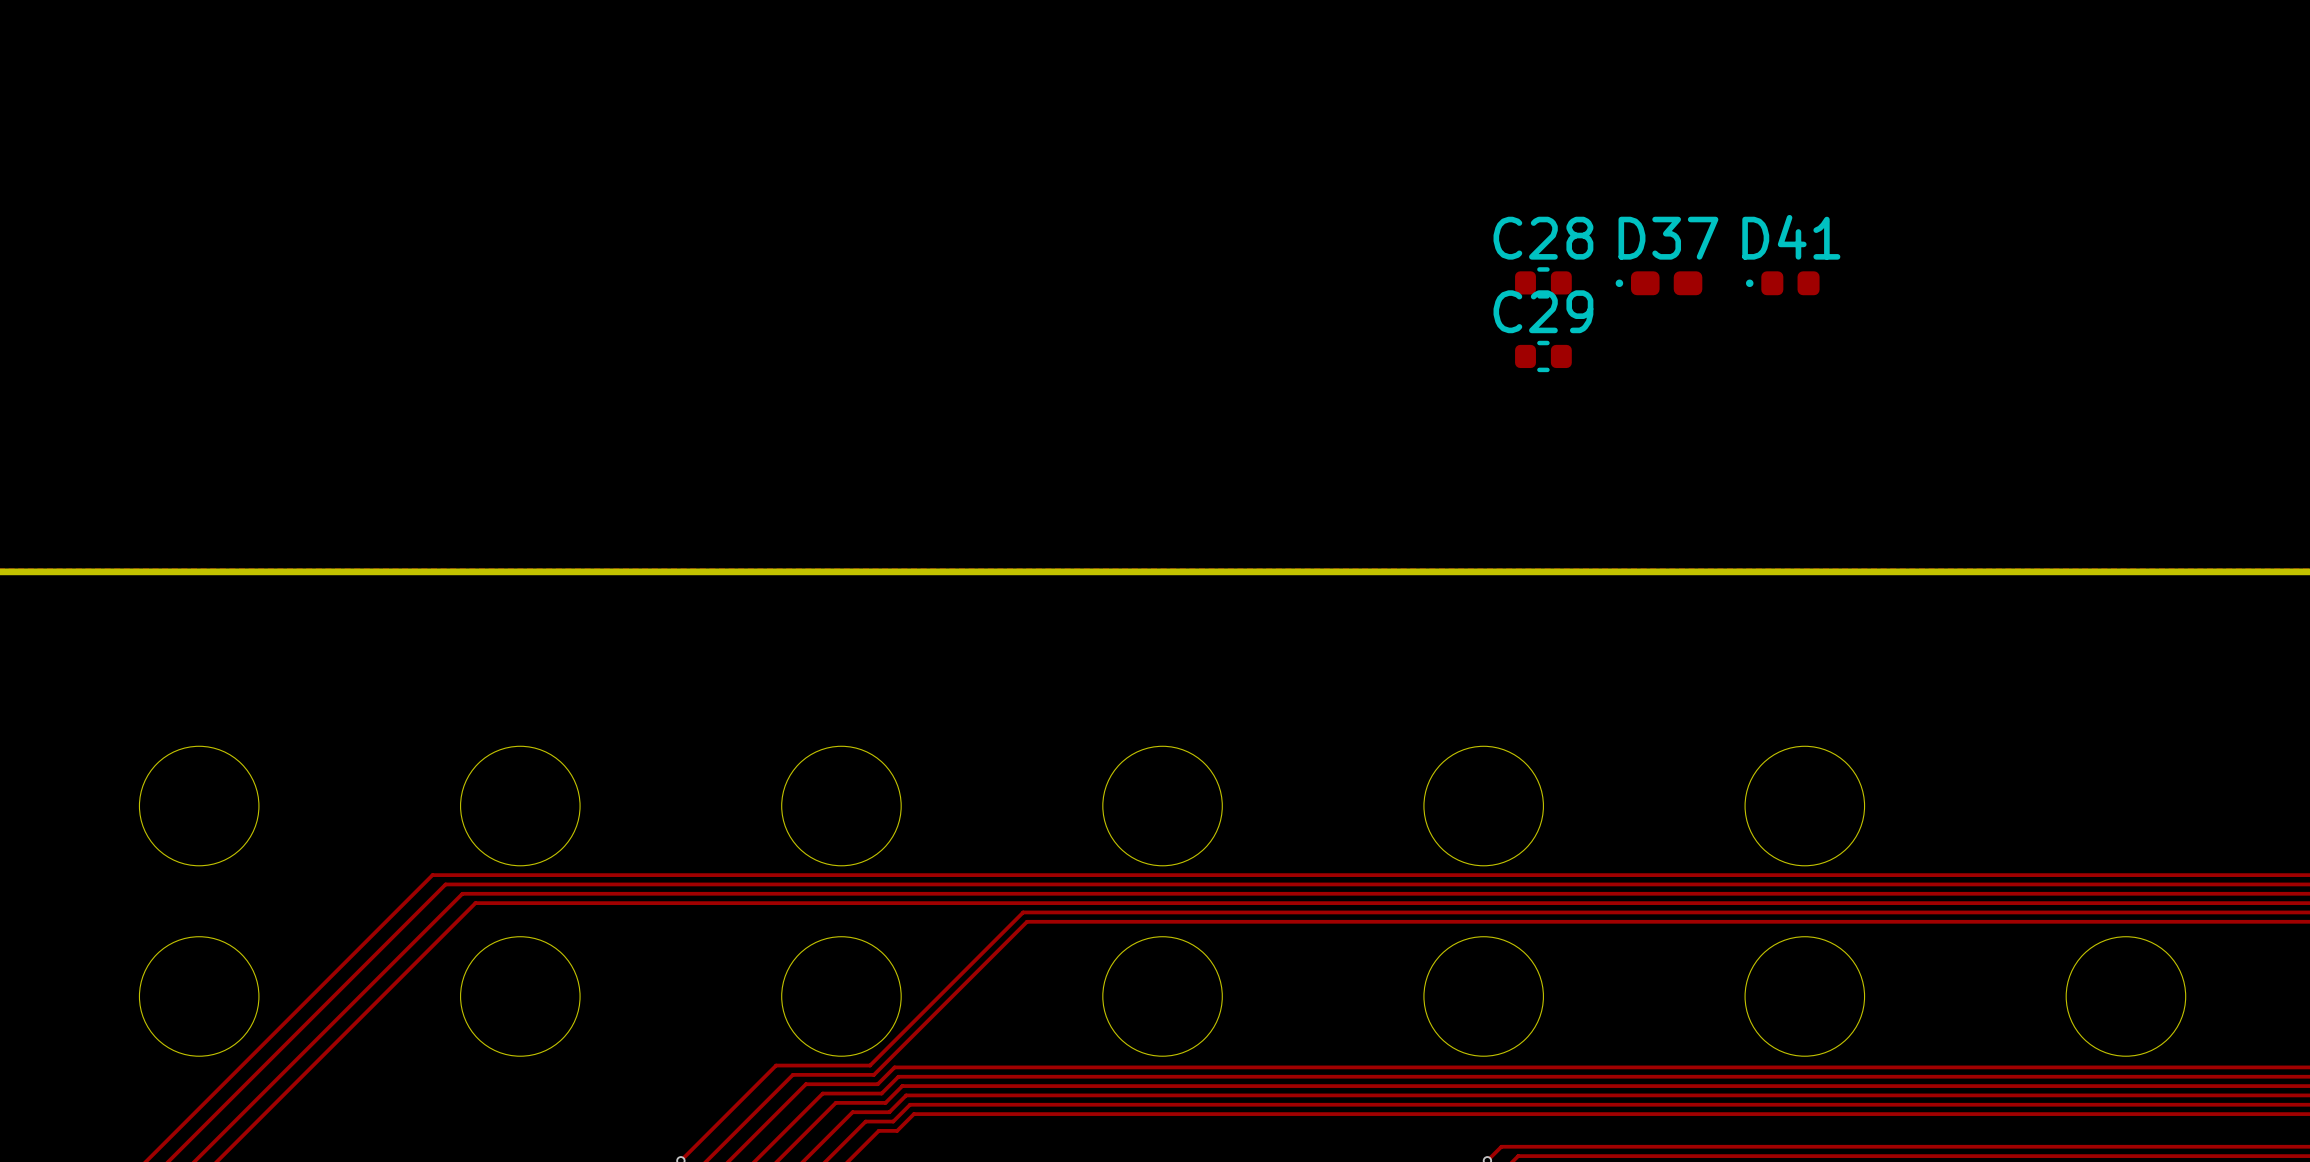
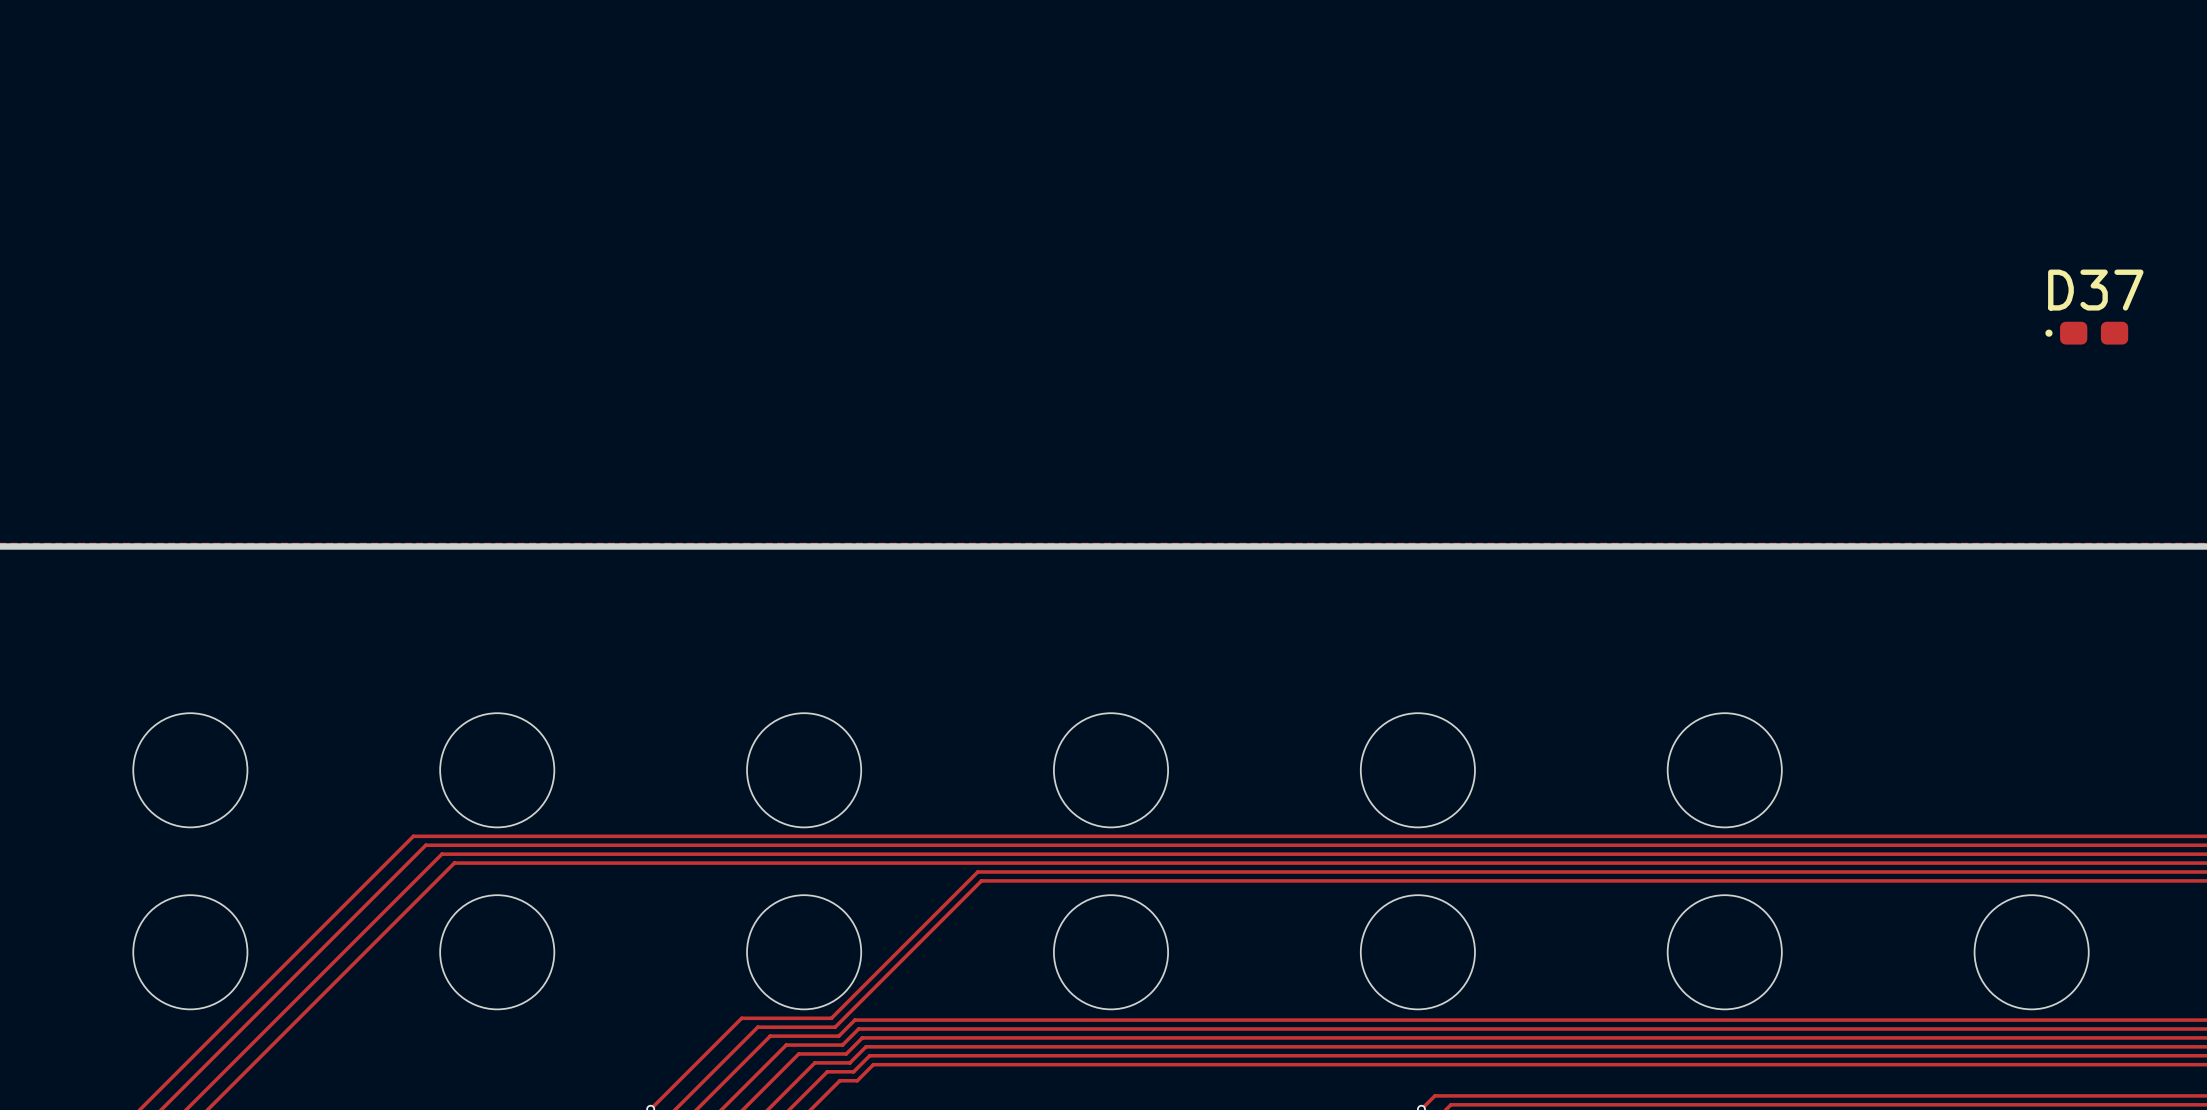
C28: (1543, 282) -> none
D37 position: (1659, 283) -> (2086, 333)
D41: (1782, 283) -> none
C29: (1543, 356) -> none

